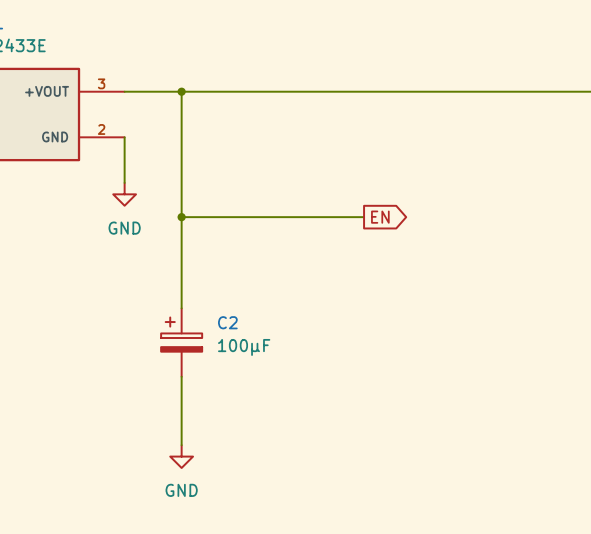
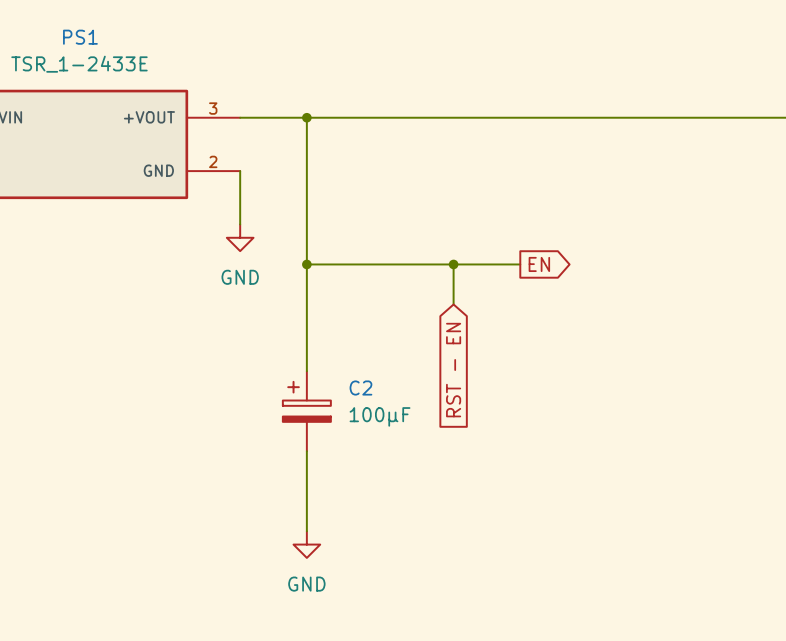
wire: none -> (453, 264) (453, 304)
junction: none -> (453, 264)
global label: none -> RST - EN (453, 370)

